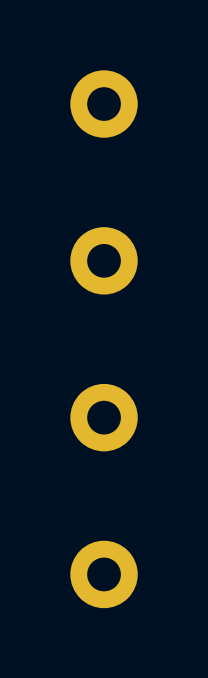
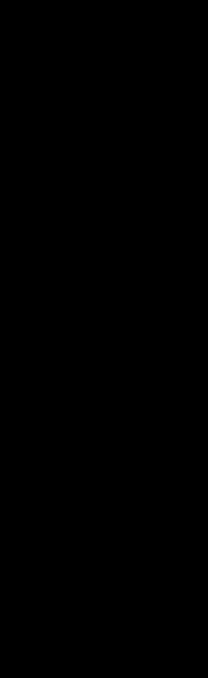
part: (104, 104) -> none
part: (104, 260) -> none
part: (104, 417) -> none
part: (104, 574) -> none

